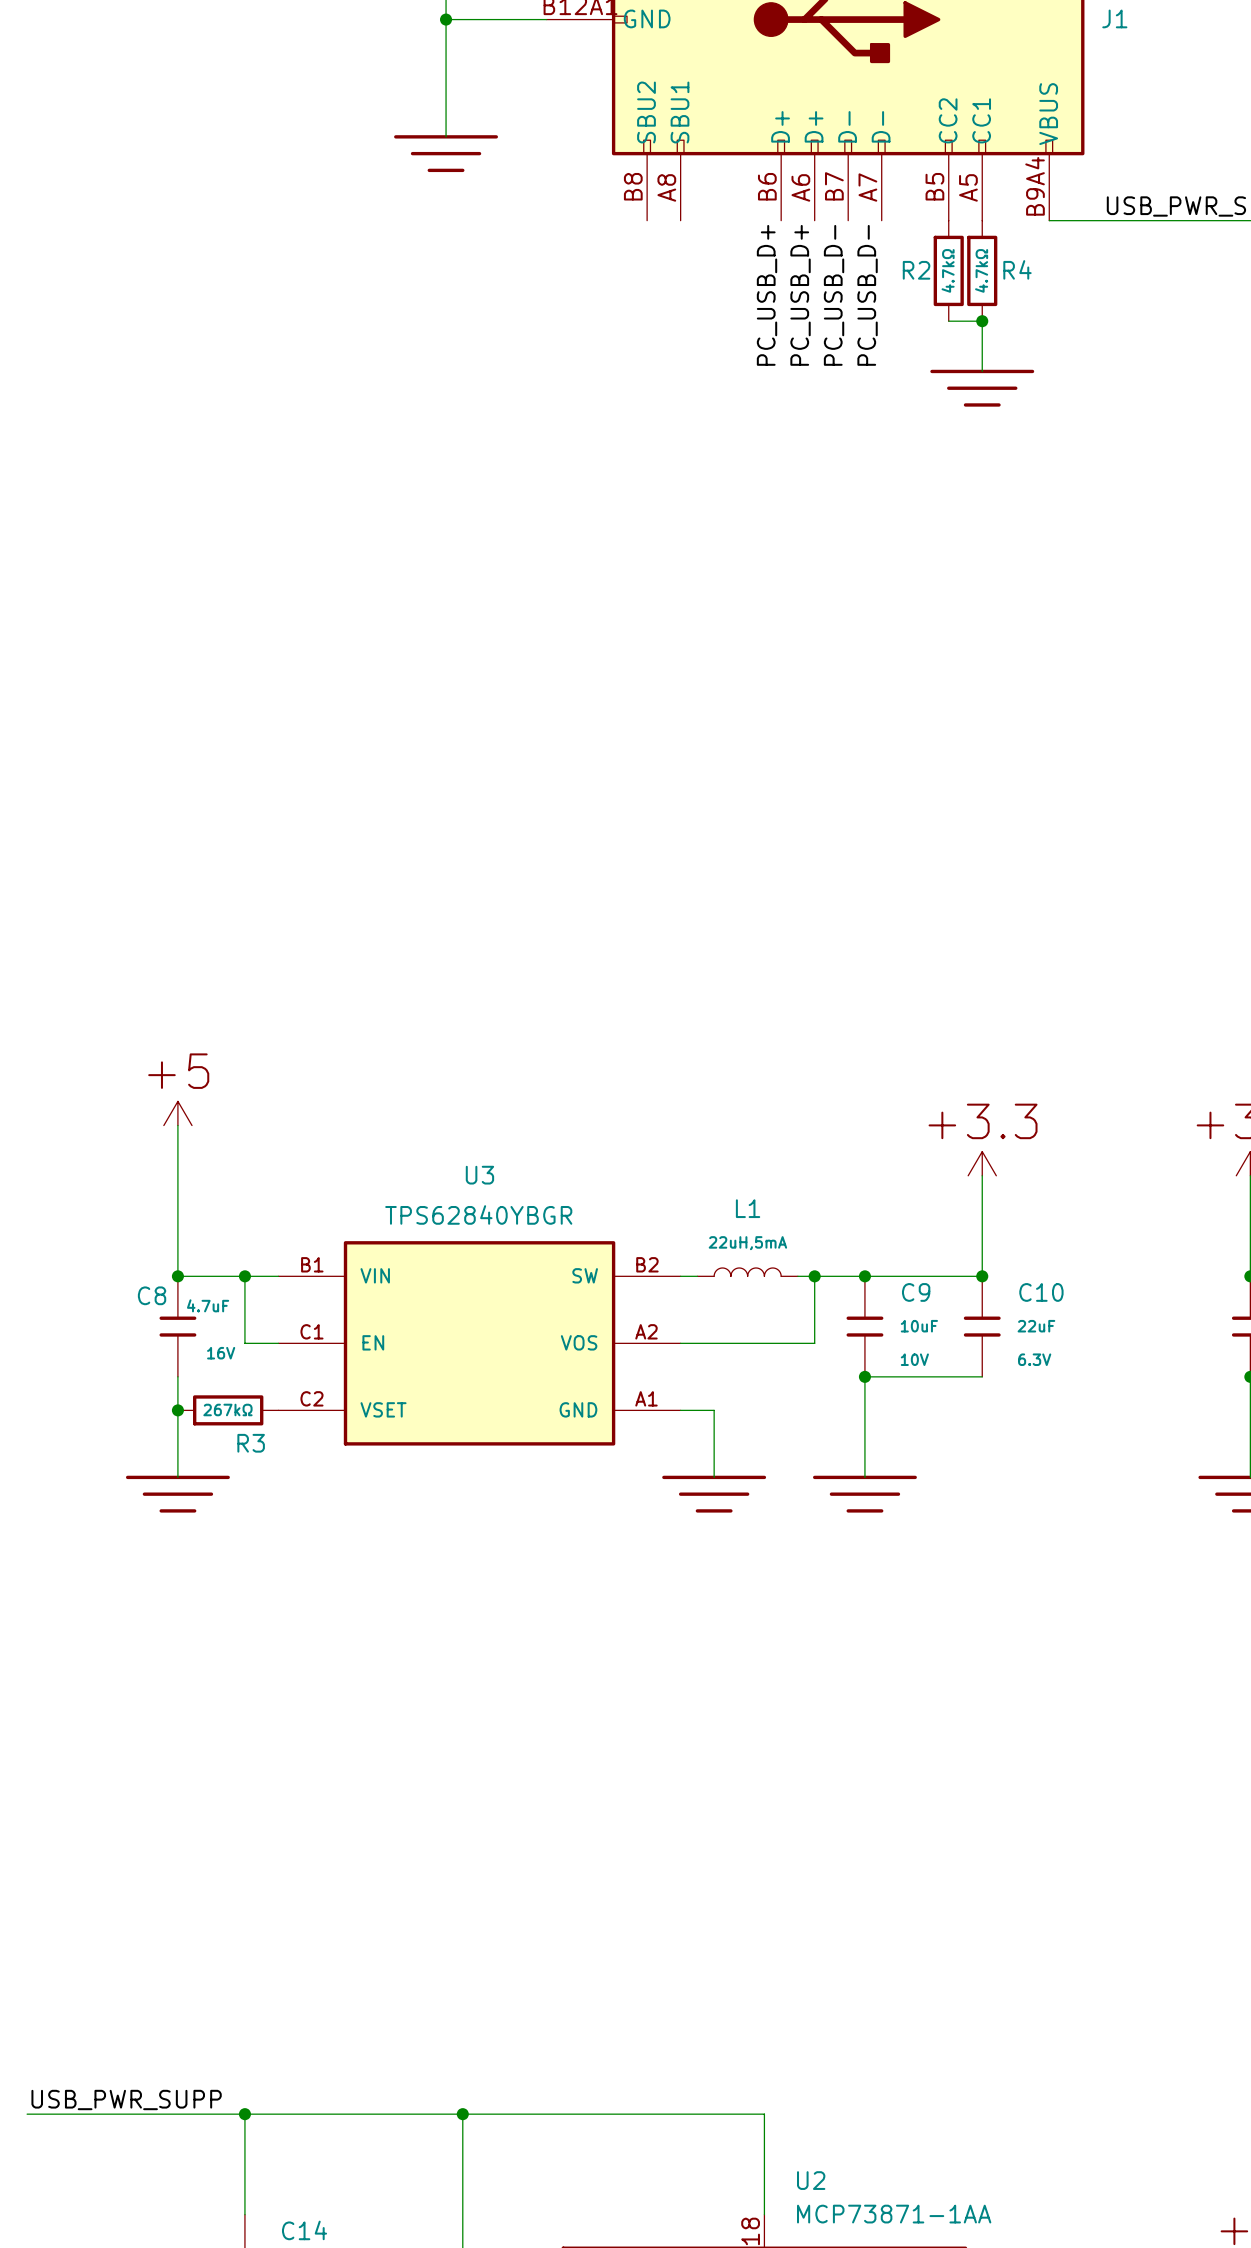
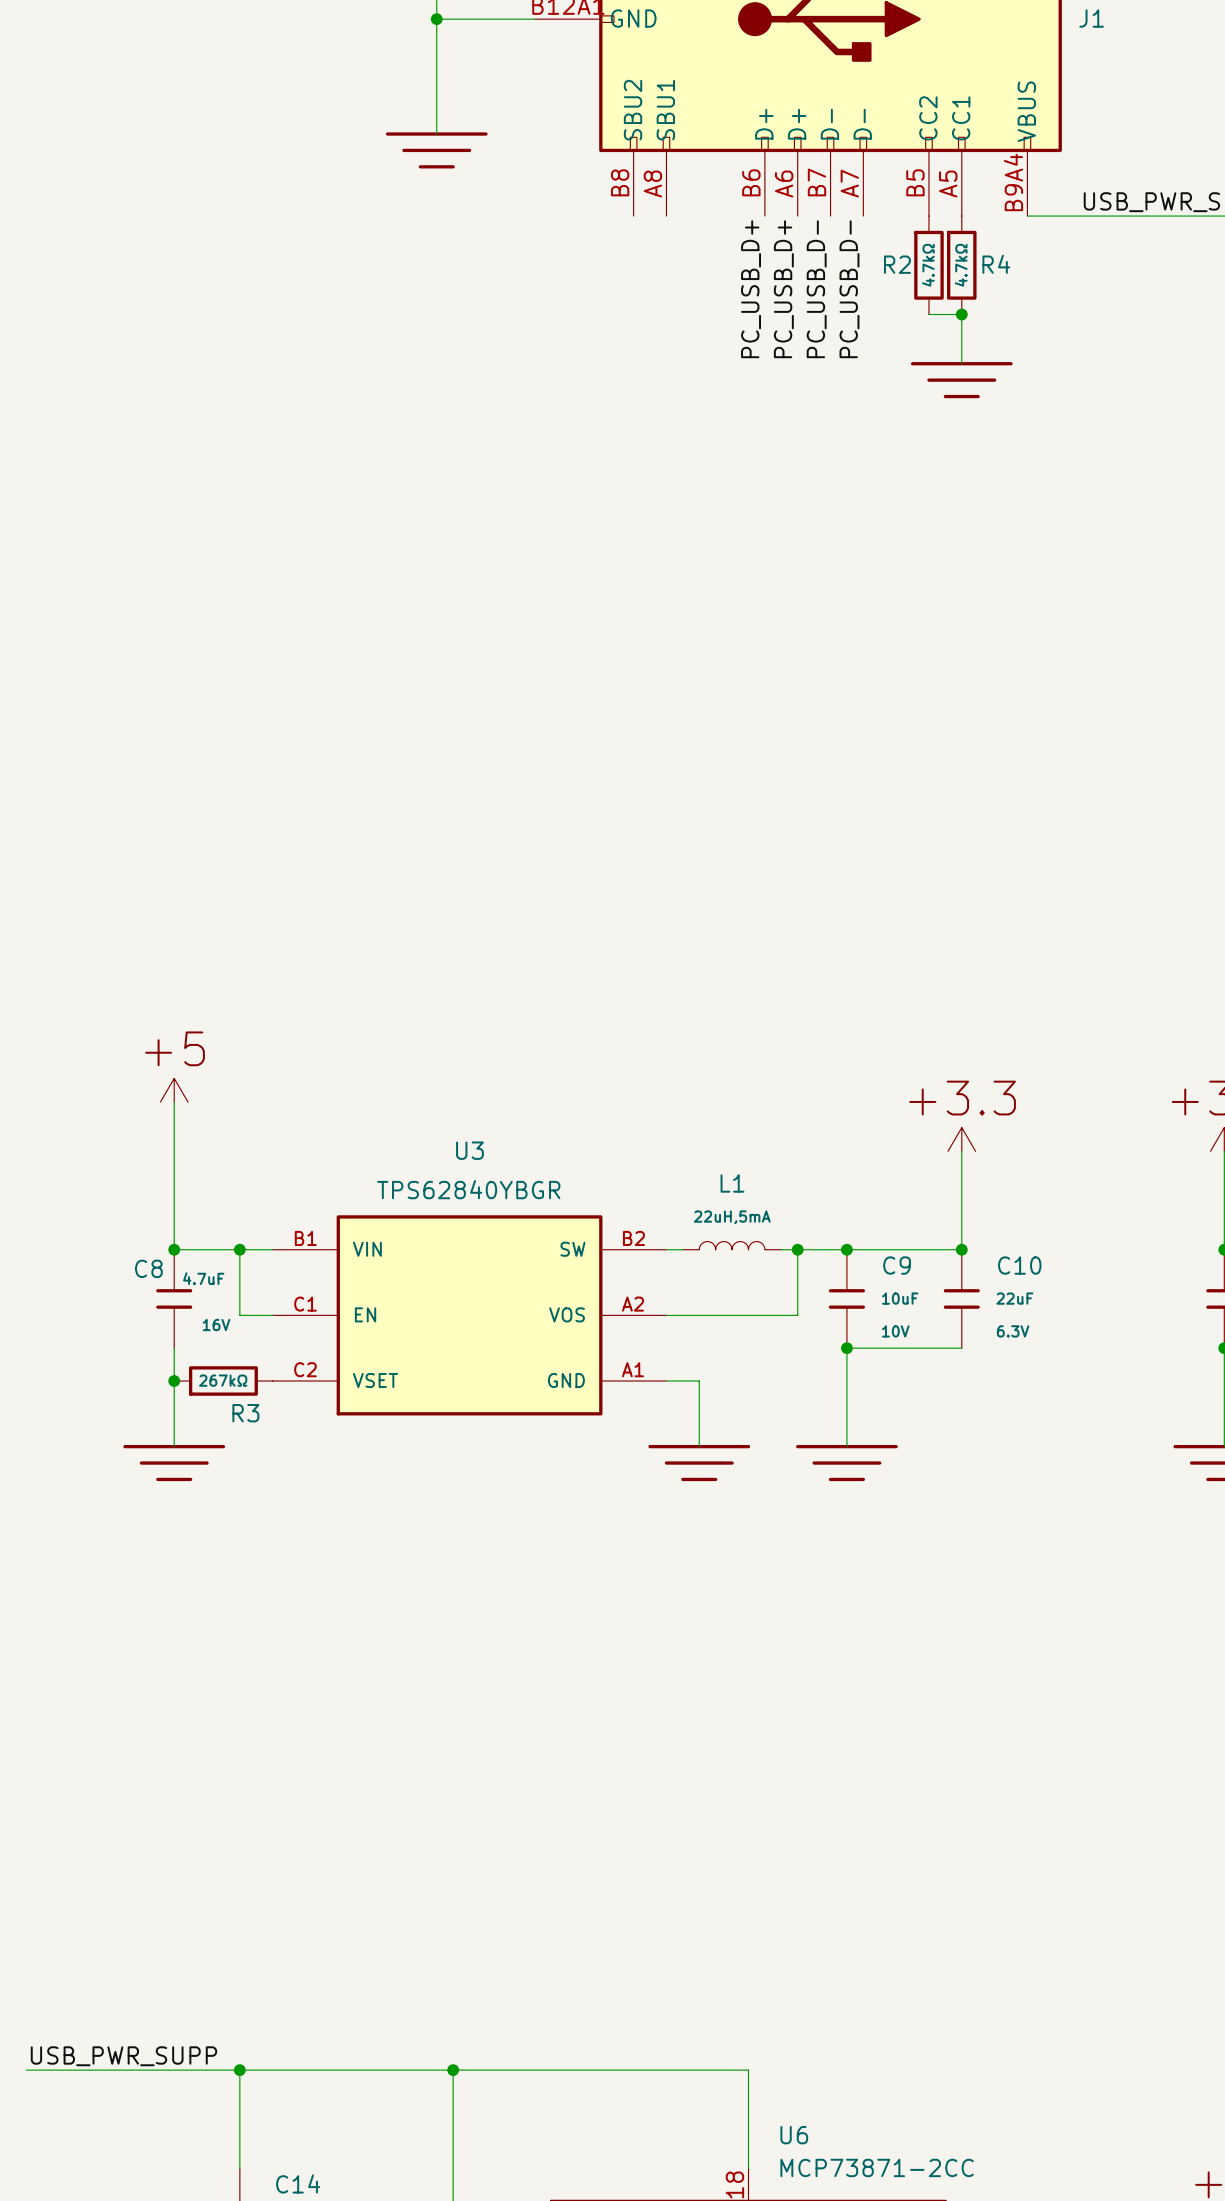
U2 name: U2 (811, 2180) -> U6 (794, 2135)
U2 value: MCP73871-1AA (894, 2214) -> MCP73871-2CC (877, 2167)

